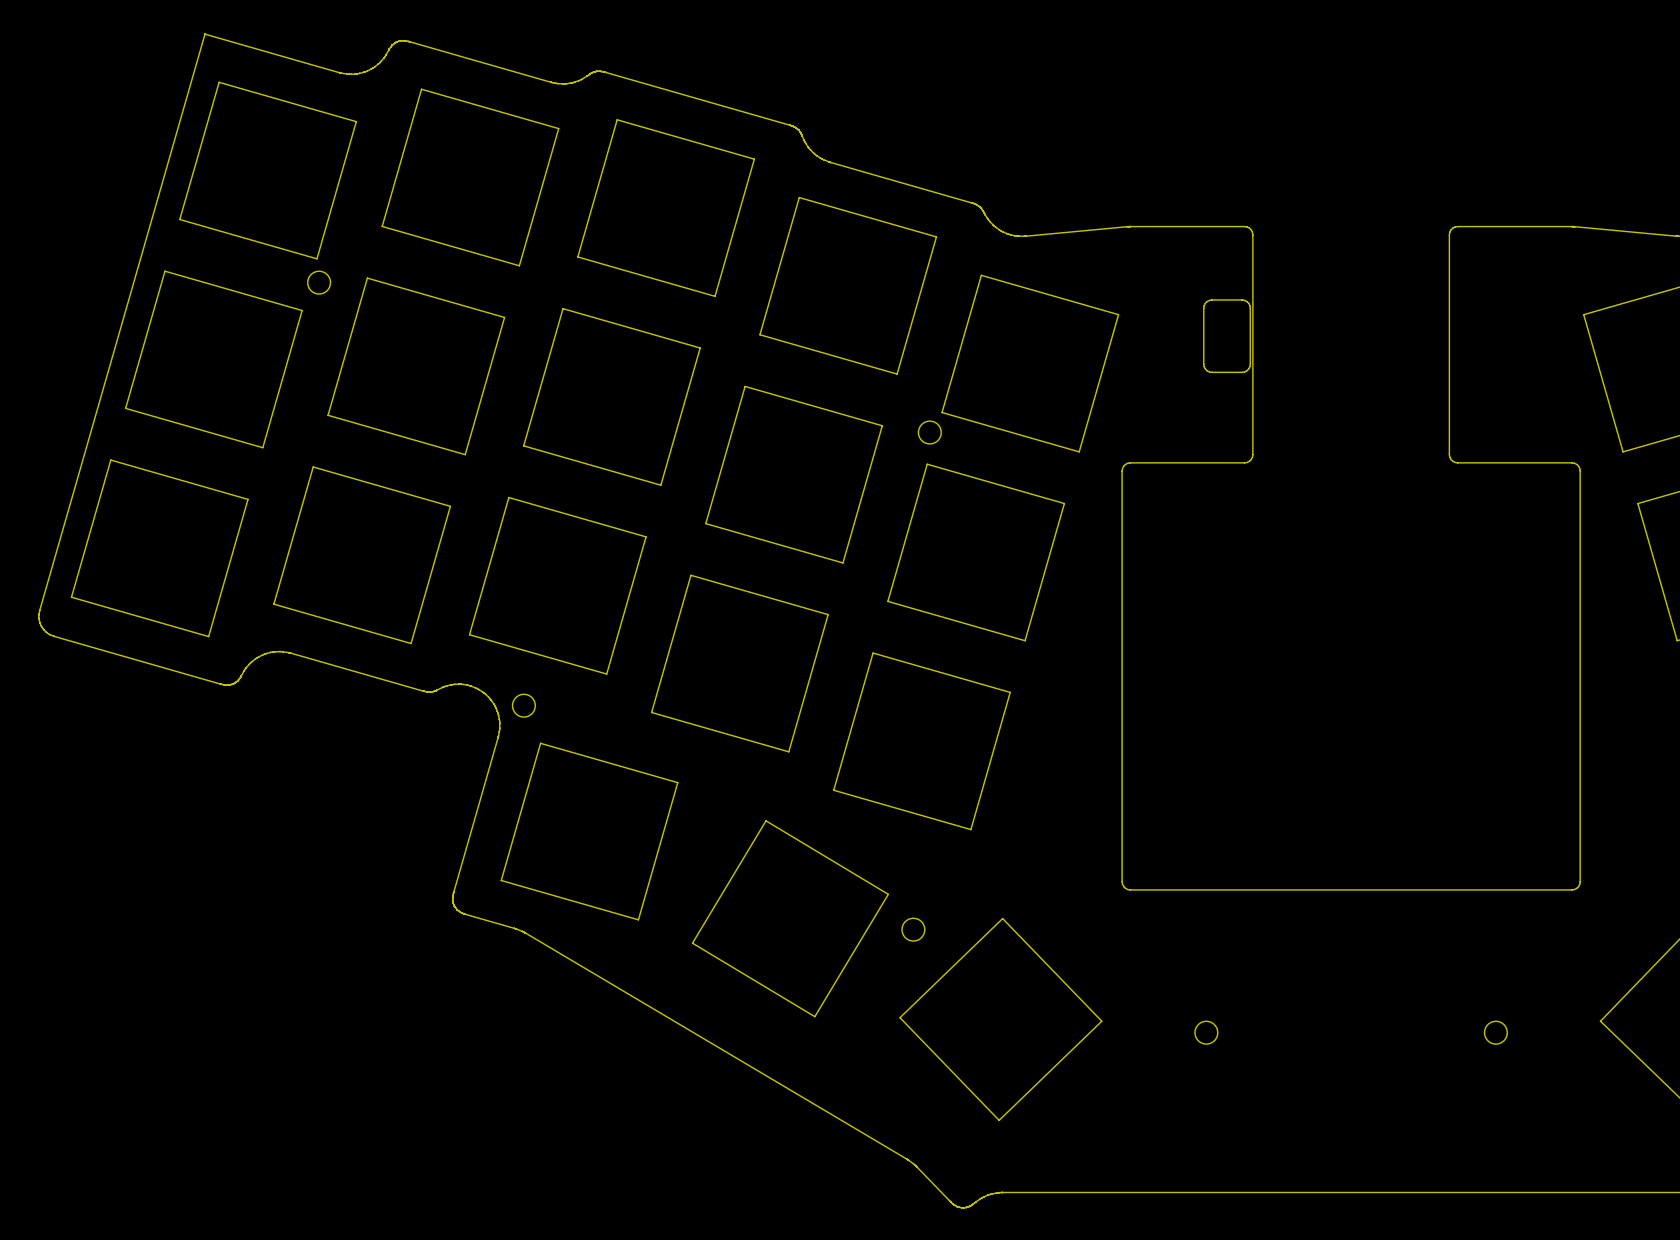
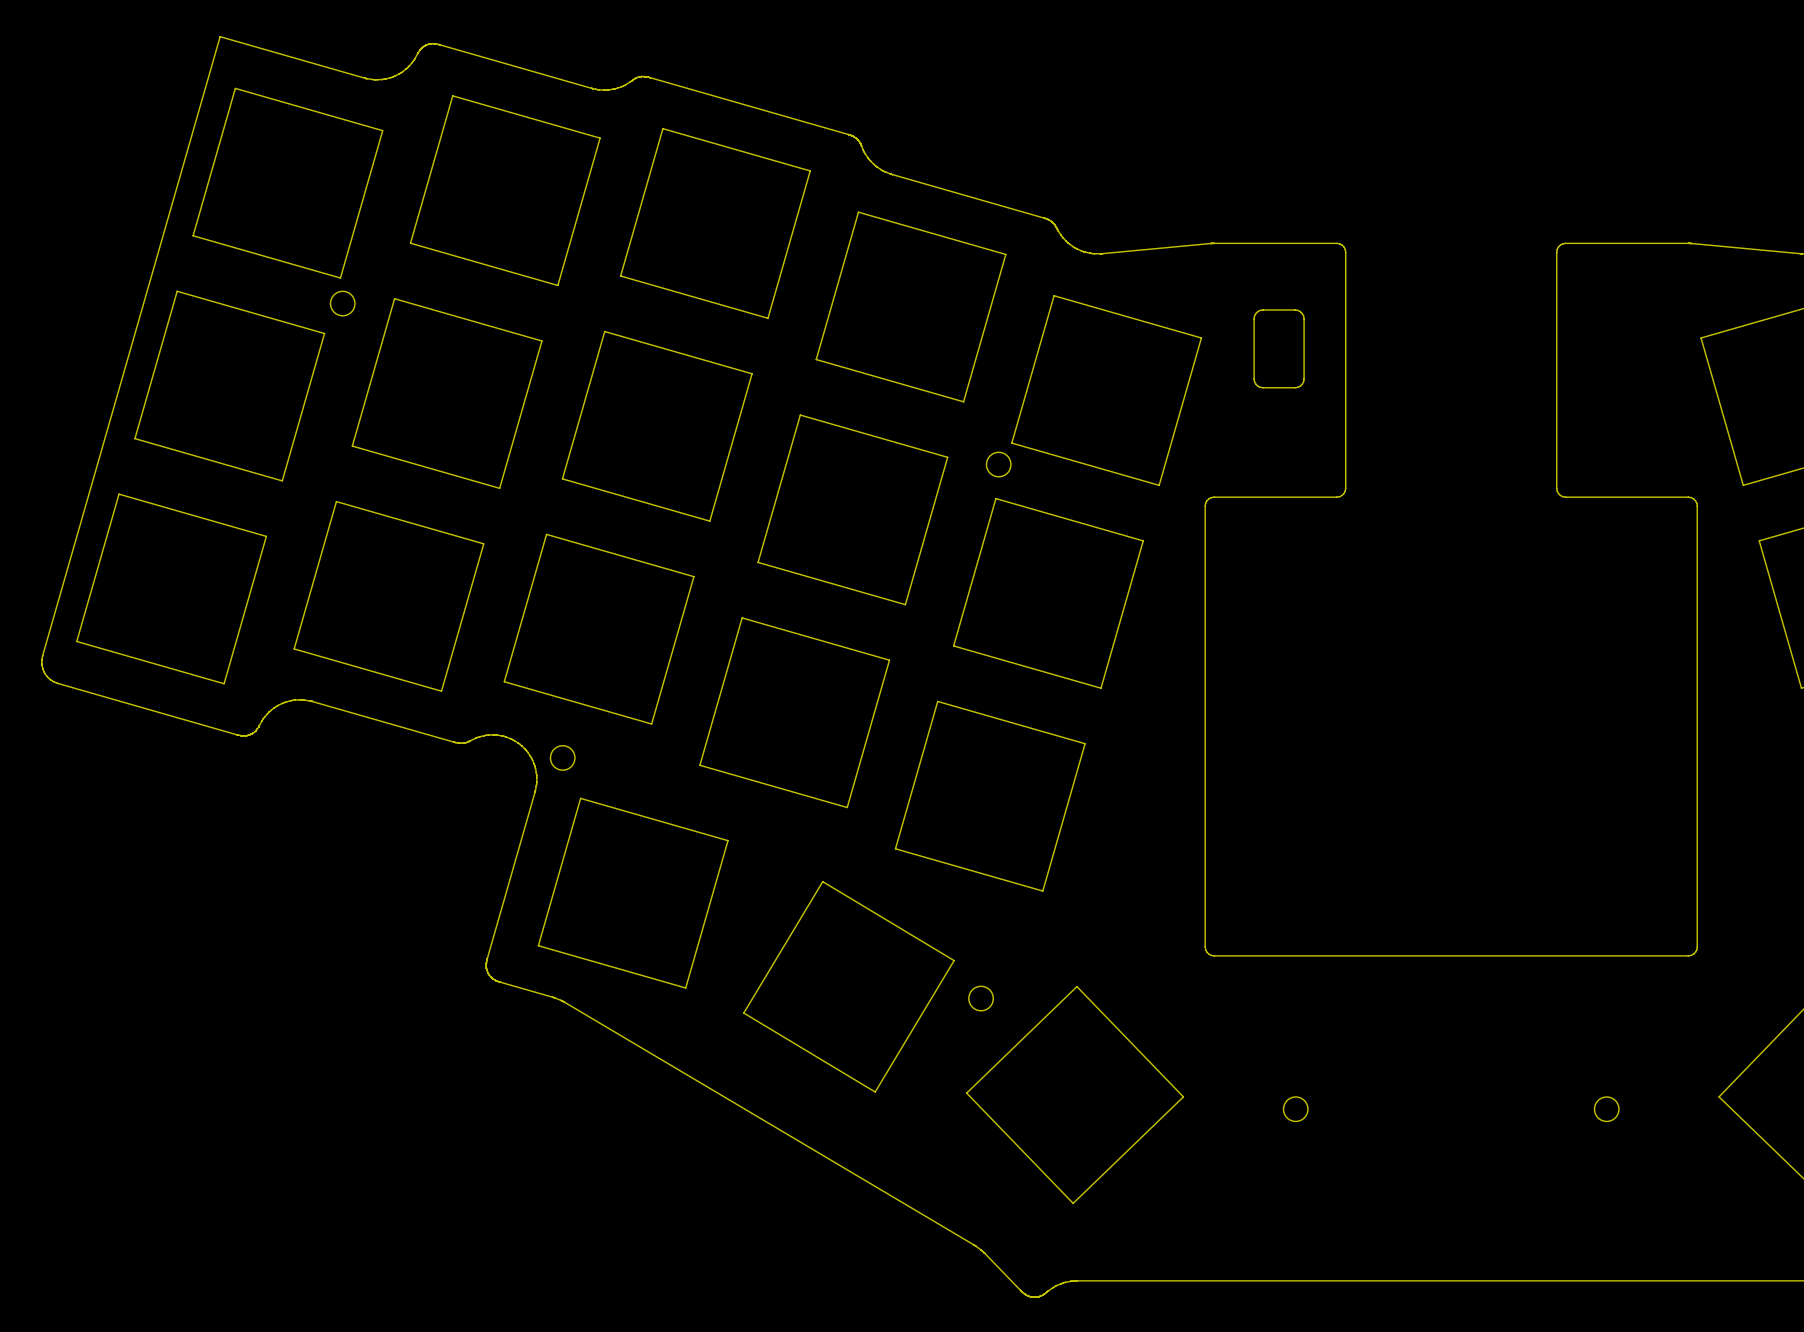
board edge: (1242, 299) (1246, 301) (1250, 308) (1249, 366) (1246, 370) (1242, 372) (1209, 371) (1205, 368) (1203, 364) (1204, 305) (1207, 301) (1212, 299) (1242, 299) -> (1295, 310) (1300, 311) (1304, 318) (1303, 381) (1300, 386) (1295, 387) (1260, 387) (1255, 384) (1254, 378) (1254, 316) (1257, 311) (1262, 310) (1295, 310)

